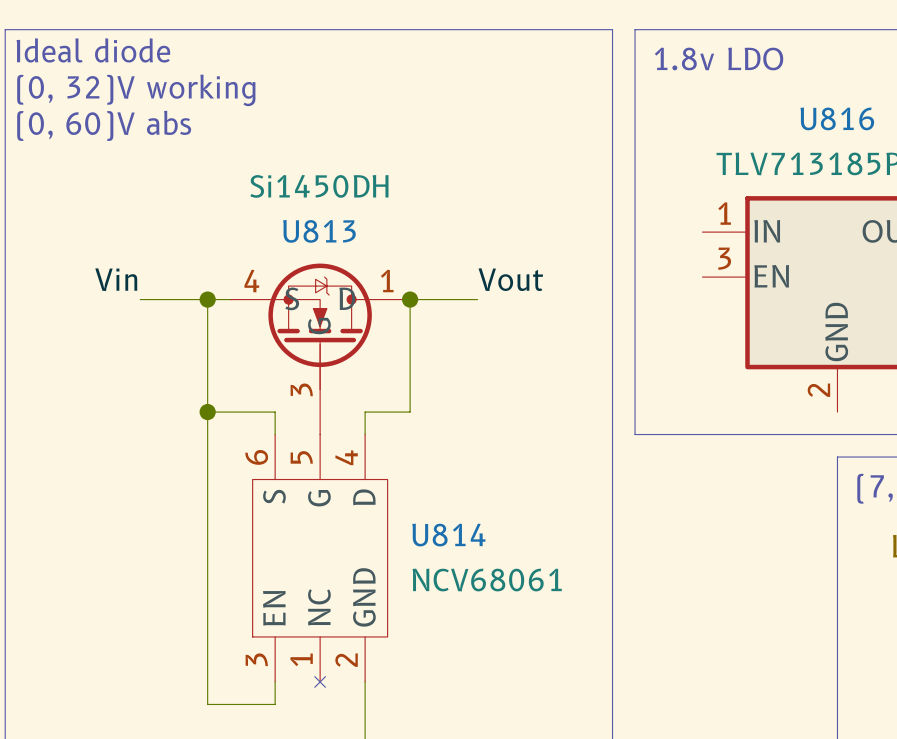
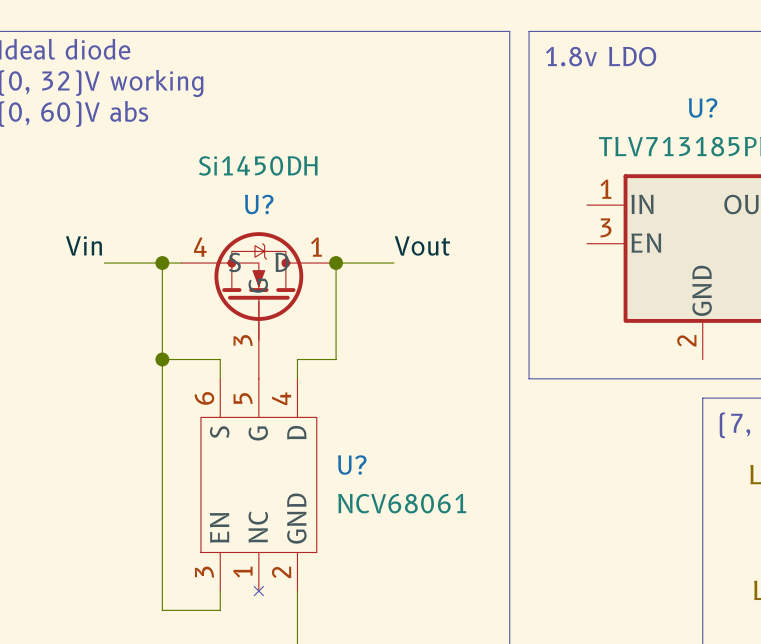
U816 name: U816 (837, 118) -> U? (703, 108)
U813 name: U813 (319, 231) -> U? (259, 204)
U814 name: U814 (448, 535) -> U? (352, 465)

